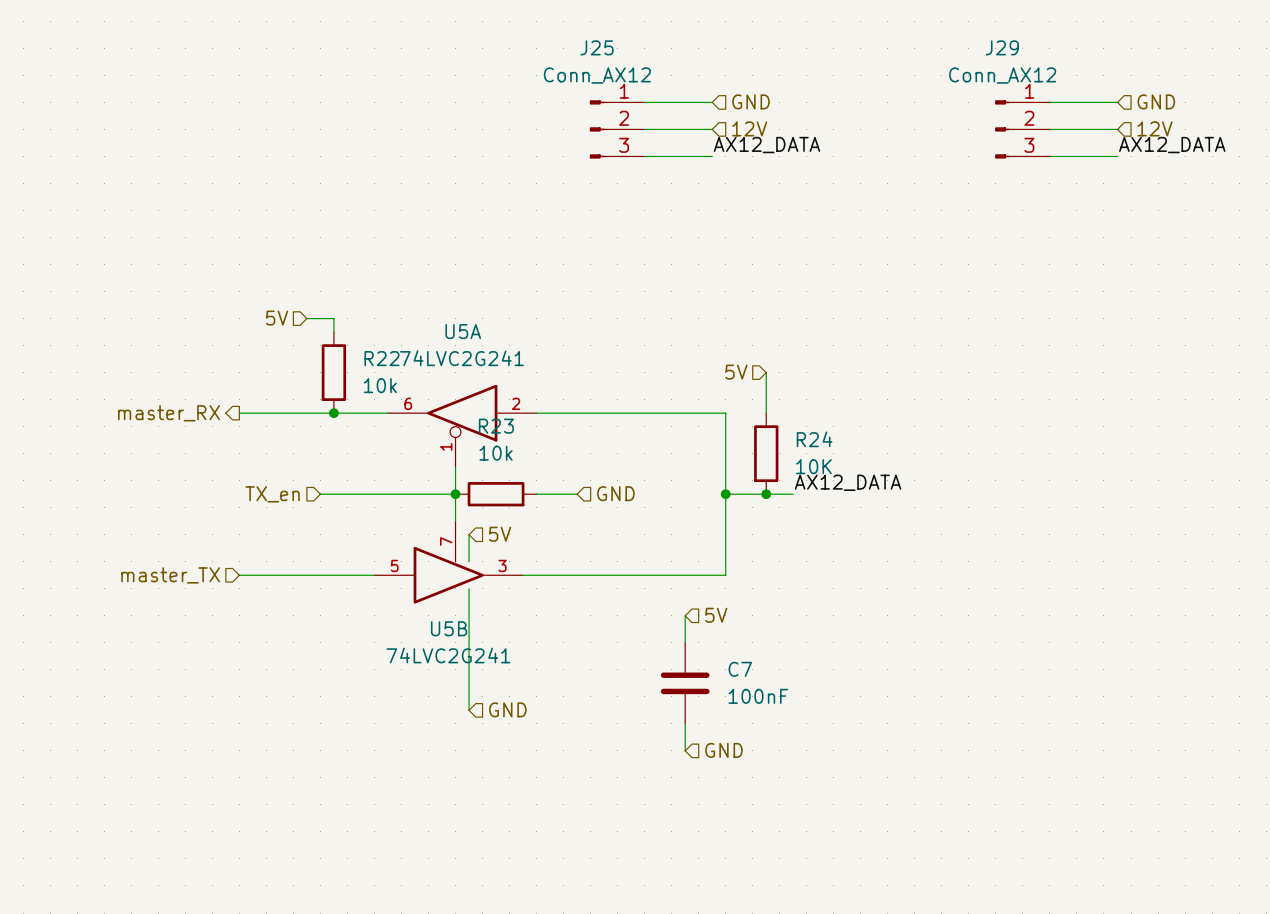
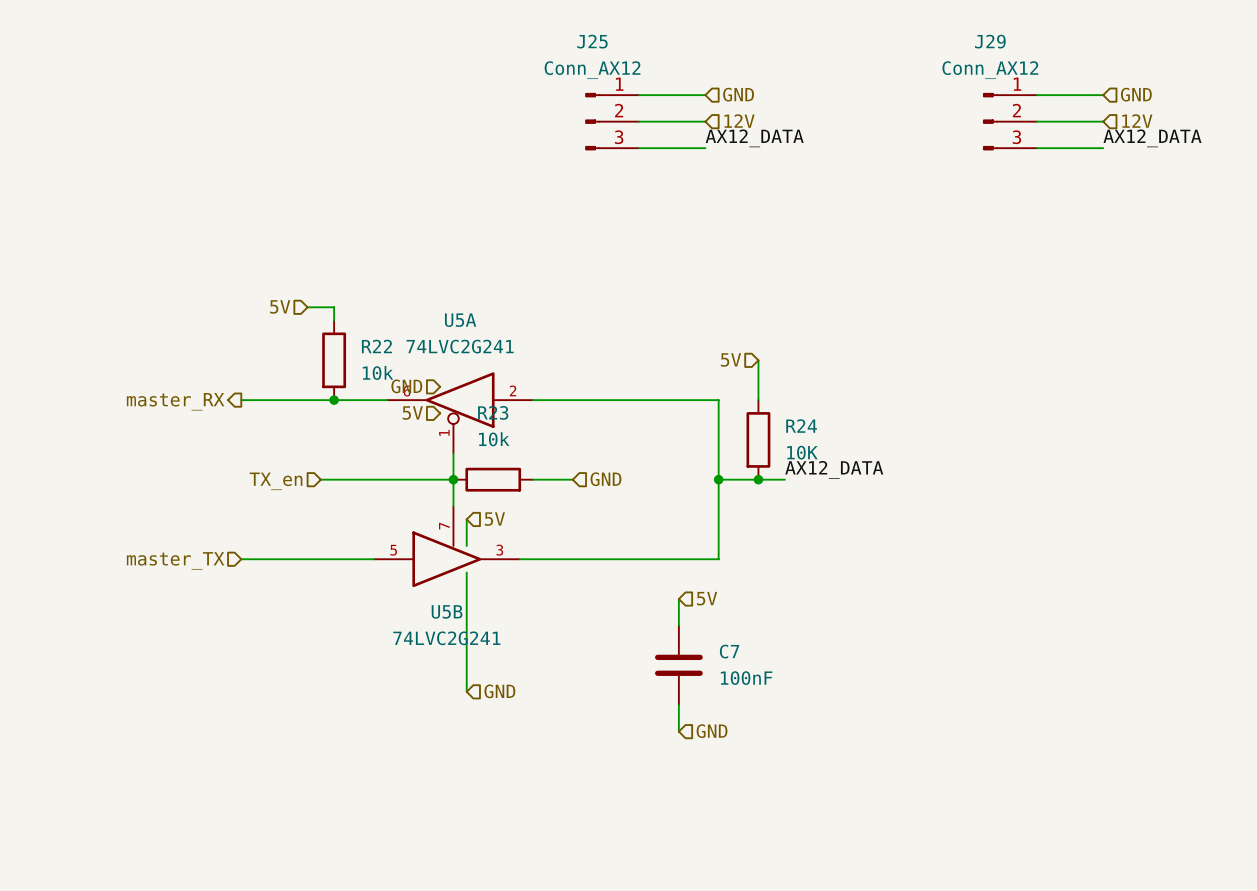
hierarchical label: none -> GND (406, 386)
hierarchical label: none -> 5V (412, 413)

